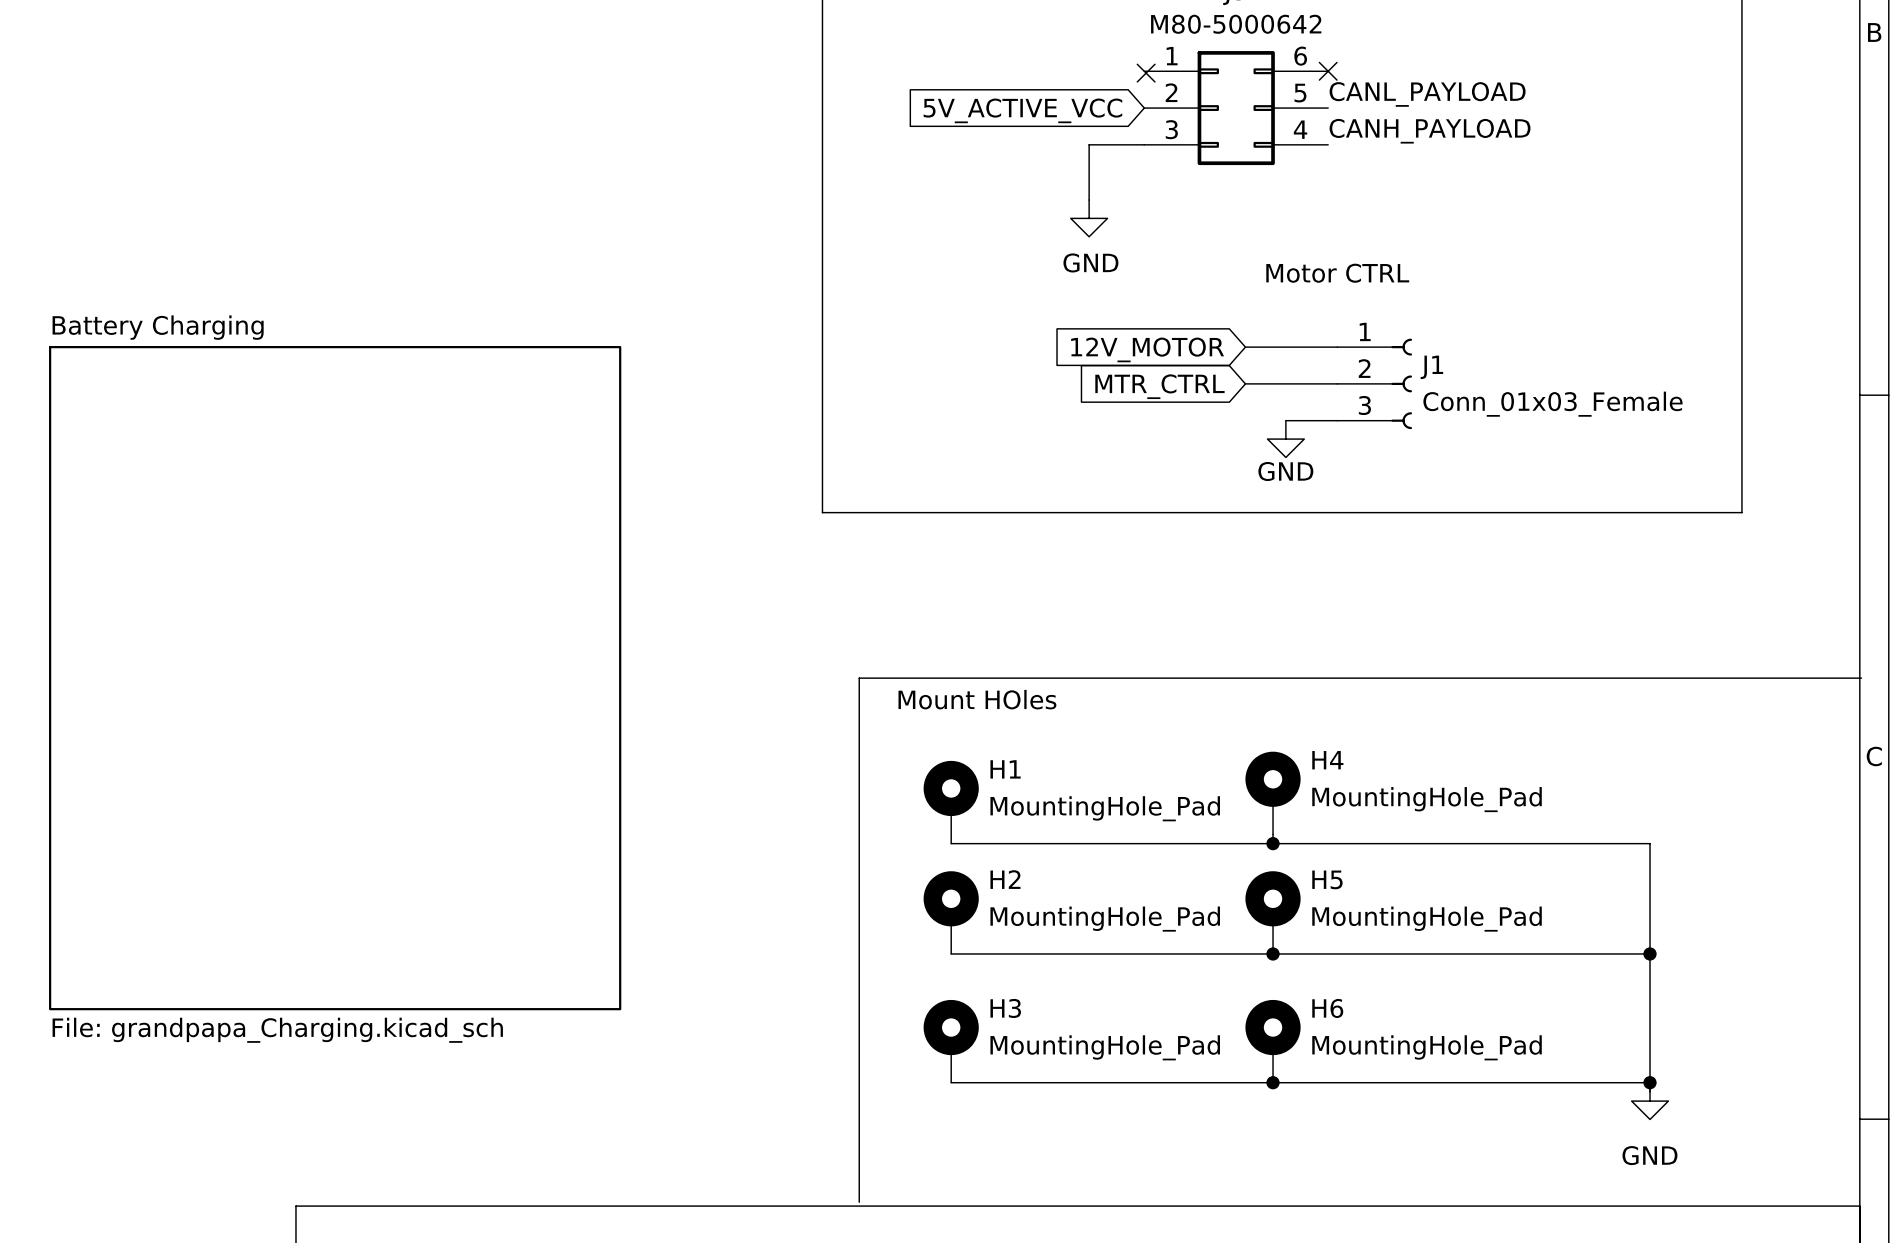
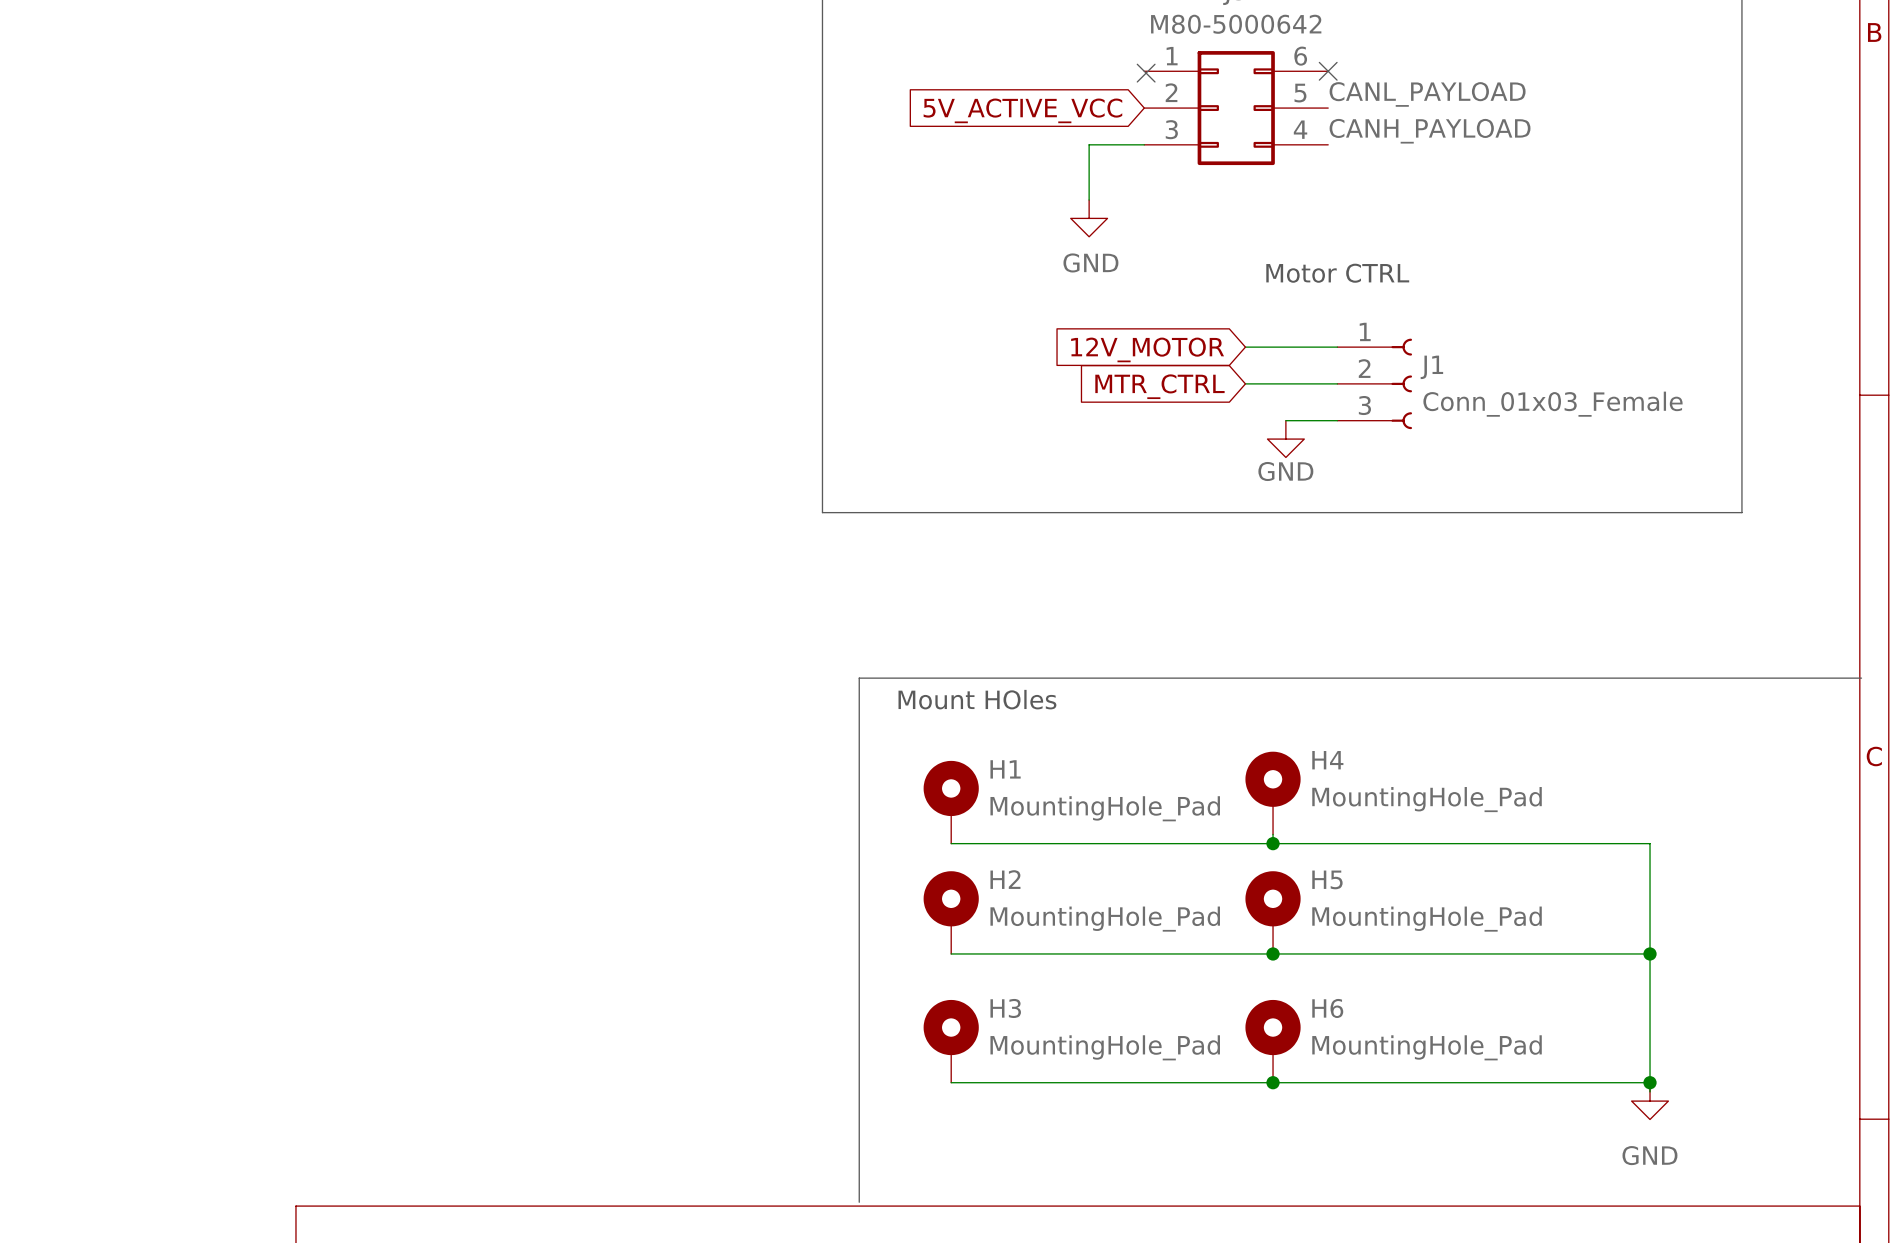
sheet Battery Charging: File: grandpapa_Charging.kicad_sch (335, 678) -> none

